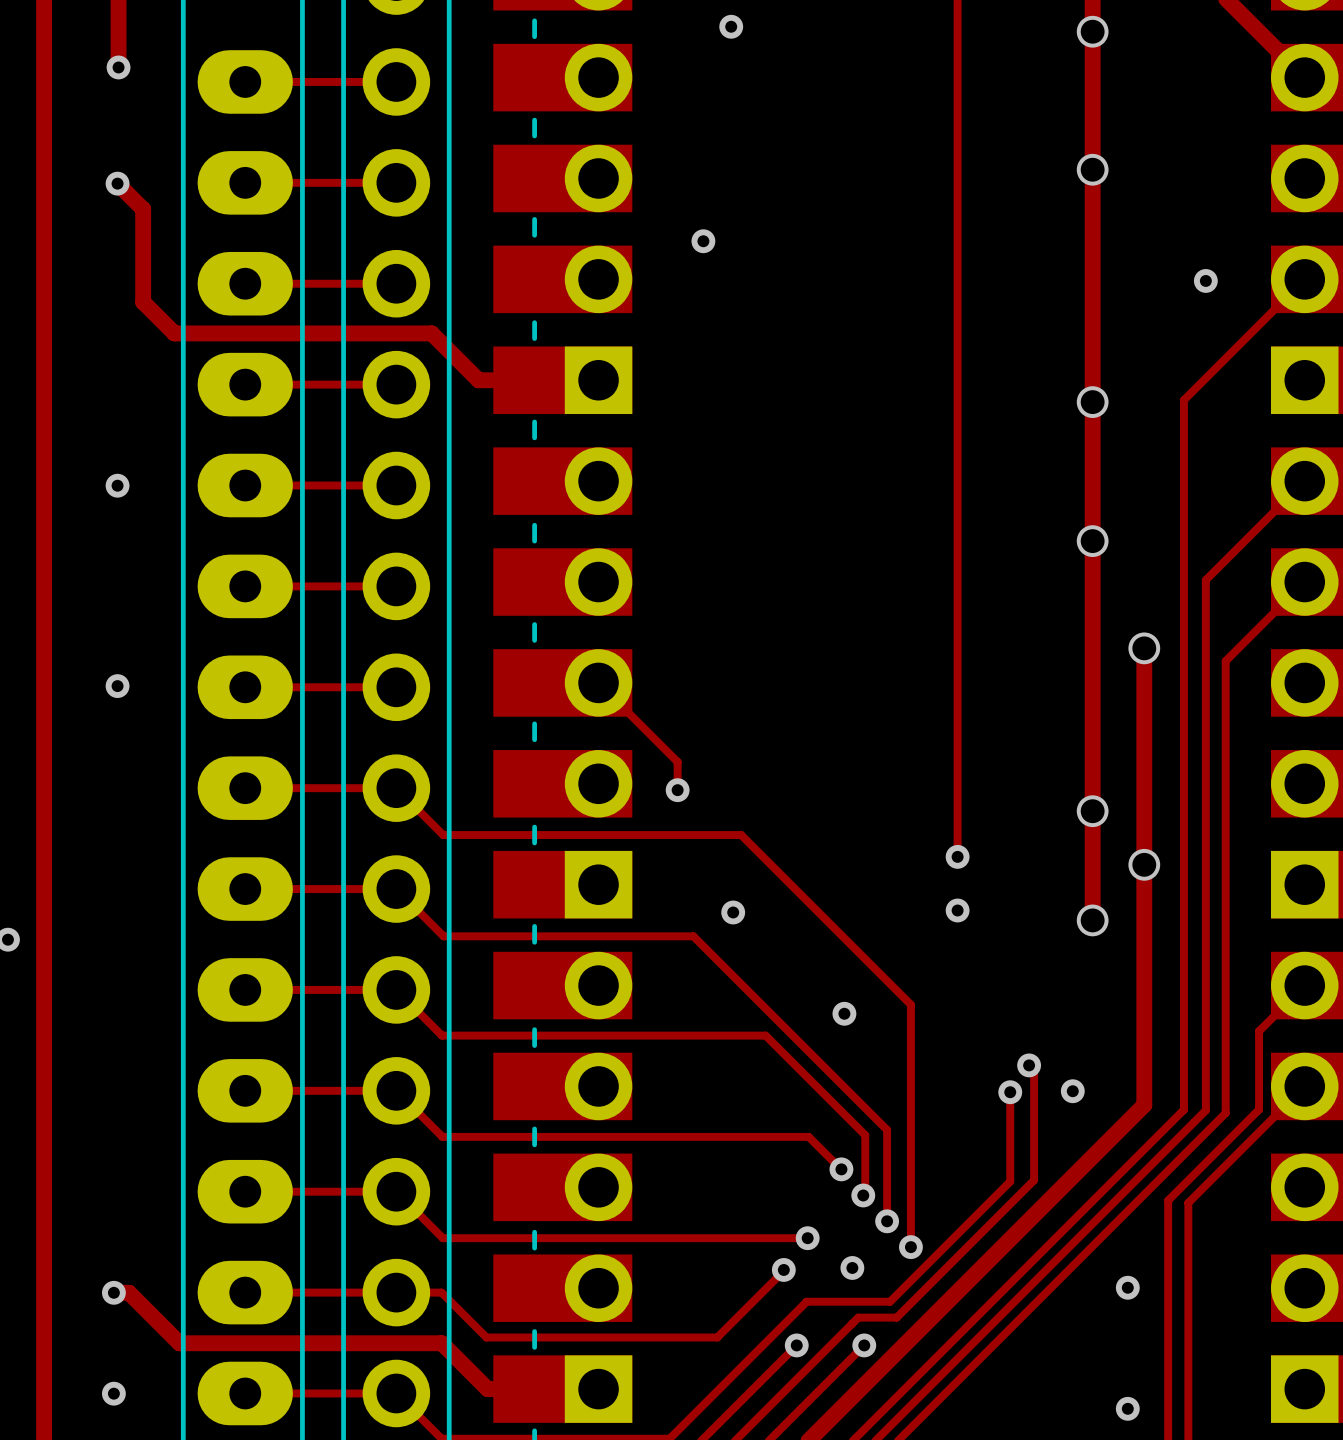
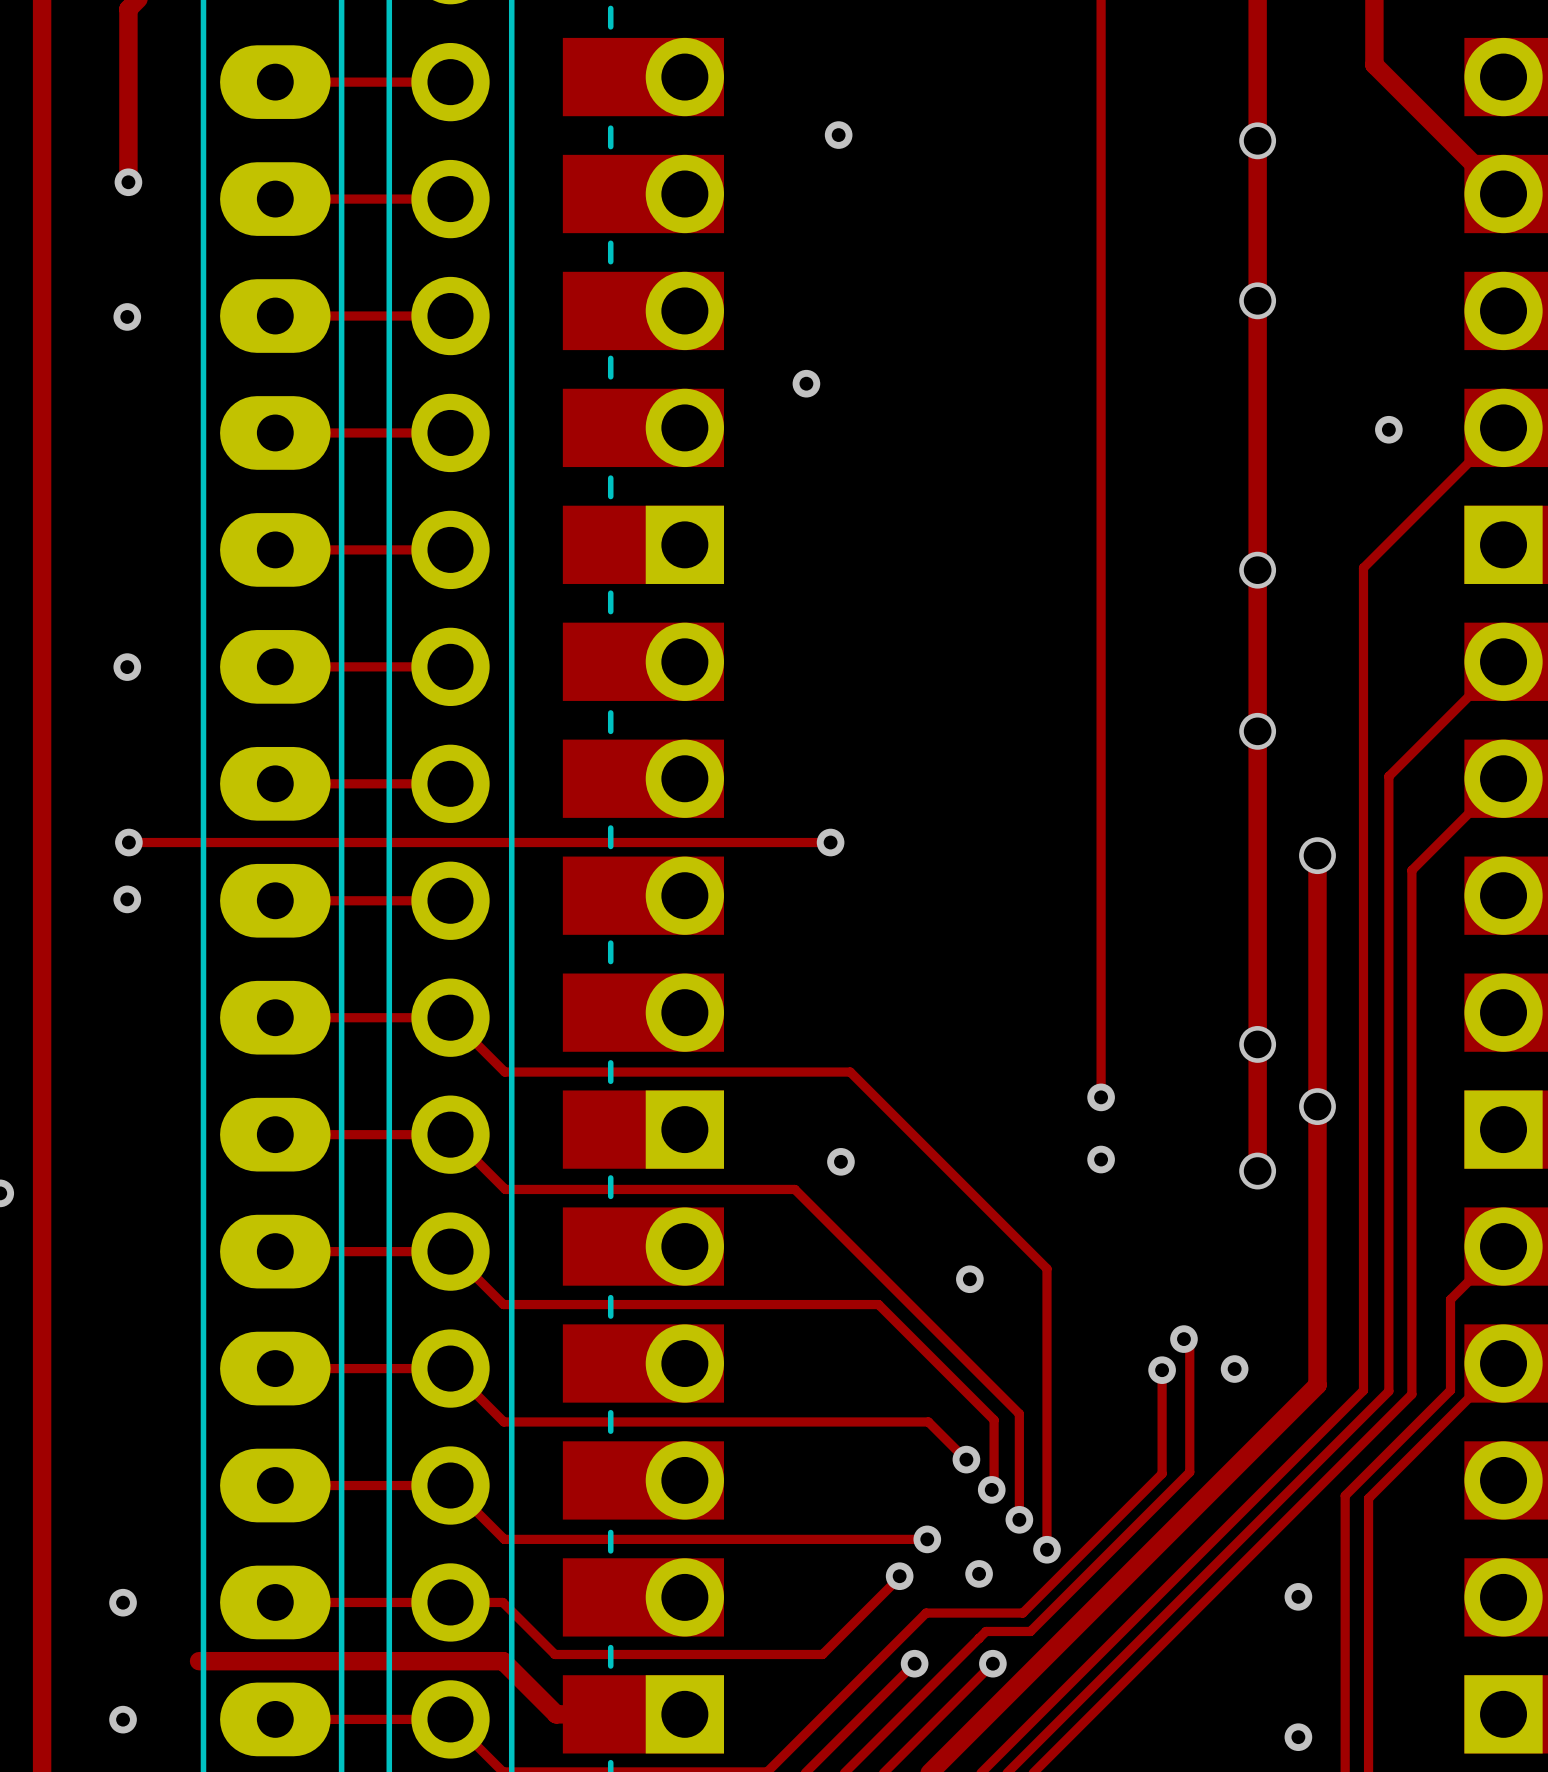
track: (117, 183) (143, 209) (143, 302) (174, 333) (431, 333) (478, 380) (598, 380) -> none
track: none -> (128, 842) (830, 842)
via: none -> (128, 842)
track: (598, 682) (677, 761) (677, 790) -> none
via position: (677, 790) -> (830, 842)
track: (113, 1292) (129, 1292) (179, 1343) -> none

